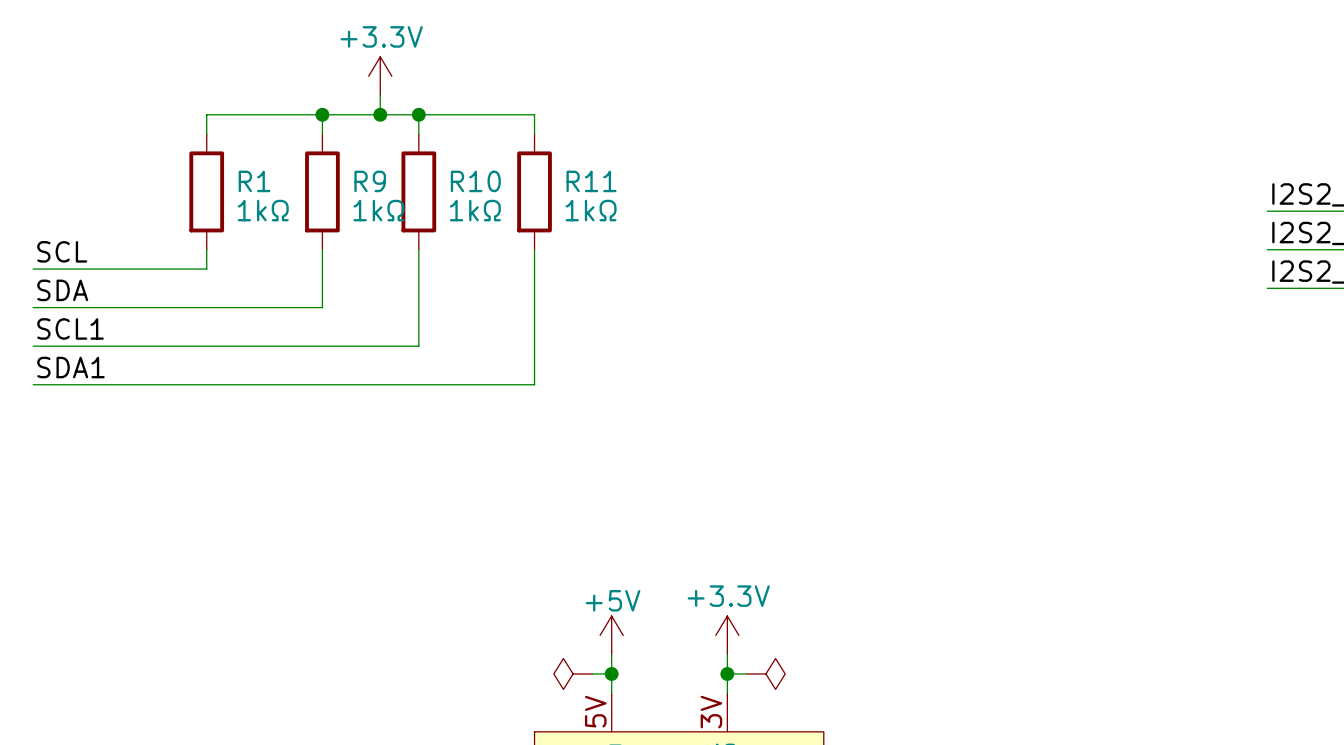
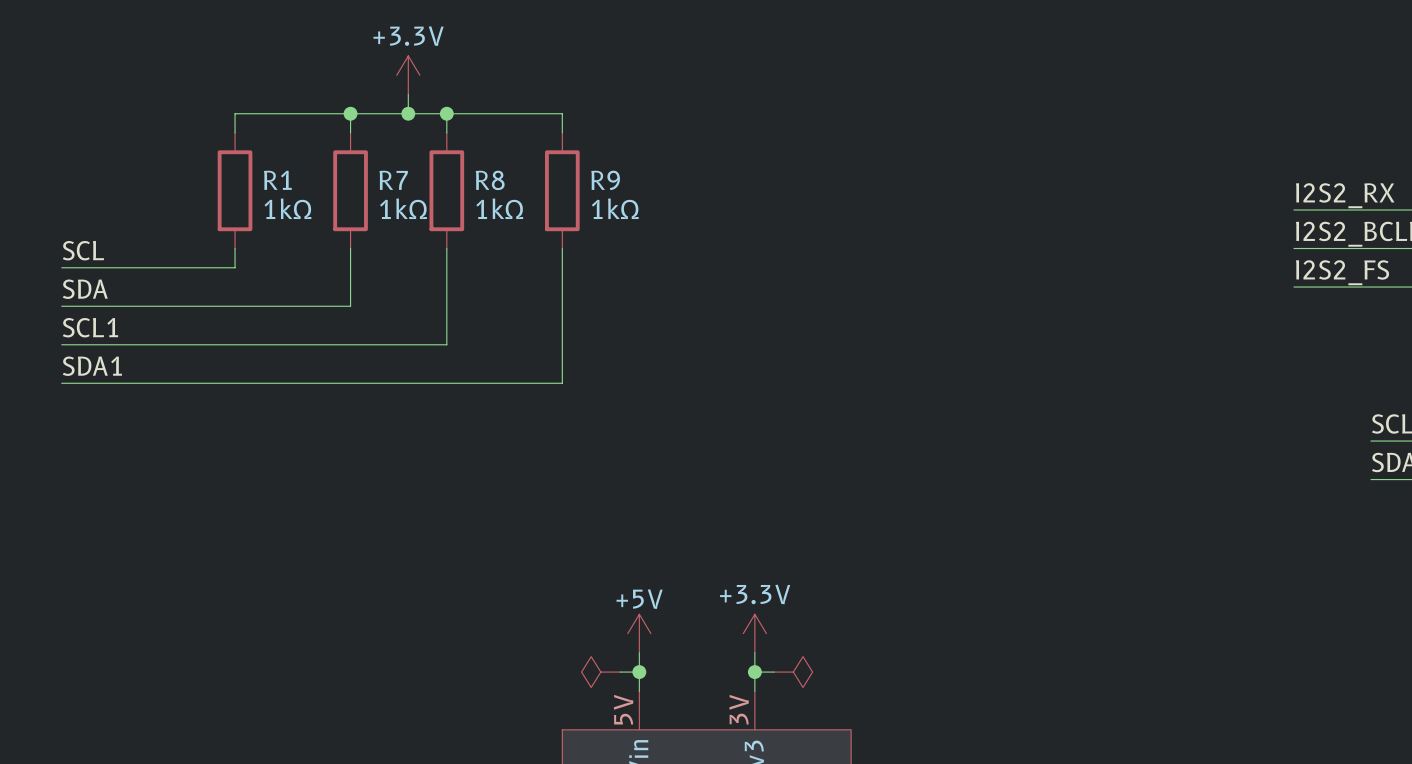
R9 name: R9 (370, 181) -> R7 (393, 180)
R10 name: R10 (475, 181) -> R8 (490, 180)
R11 name: R11 (591, 181) -> R9 (605, 180)

